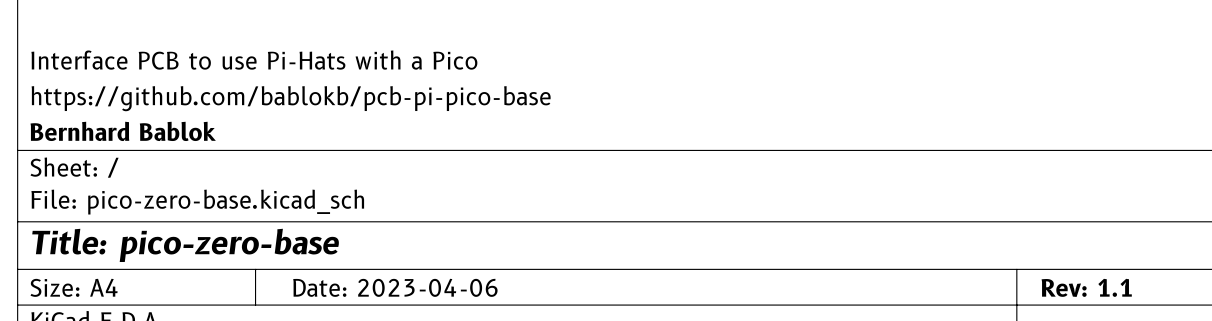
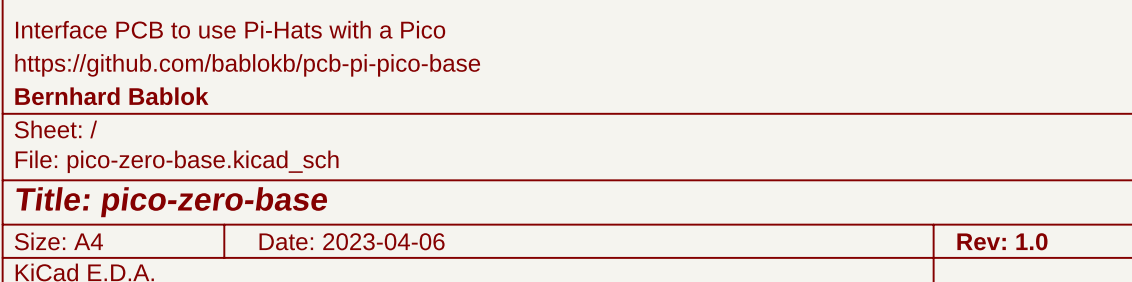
title block: Rev: 1.1 (1086, 287) -> Rev: 1.0 (1002, 241)

